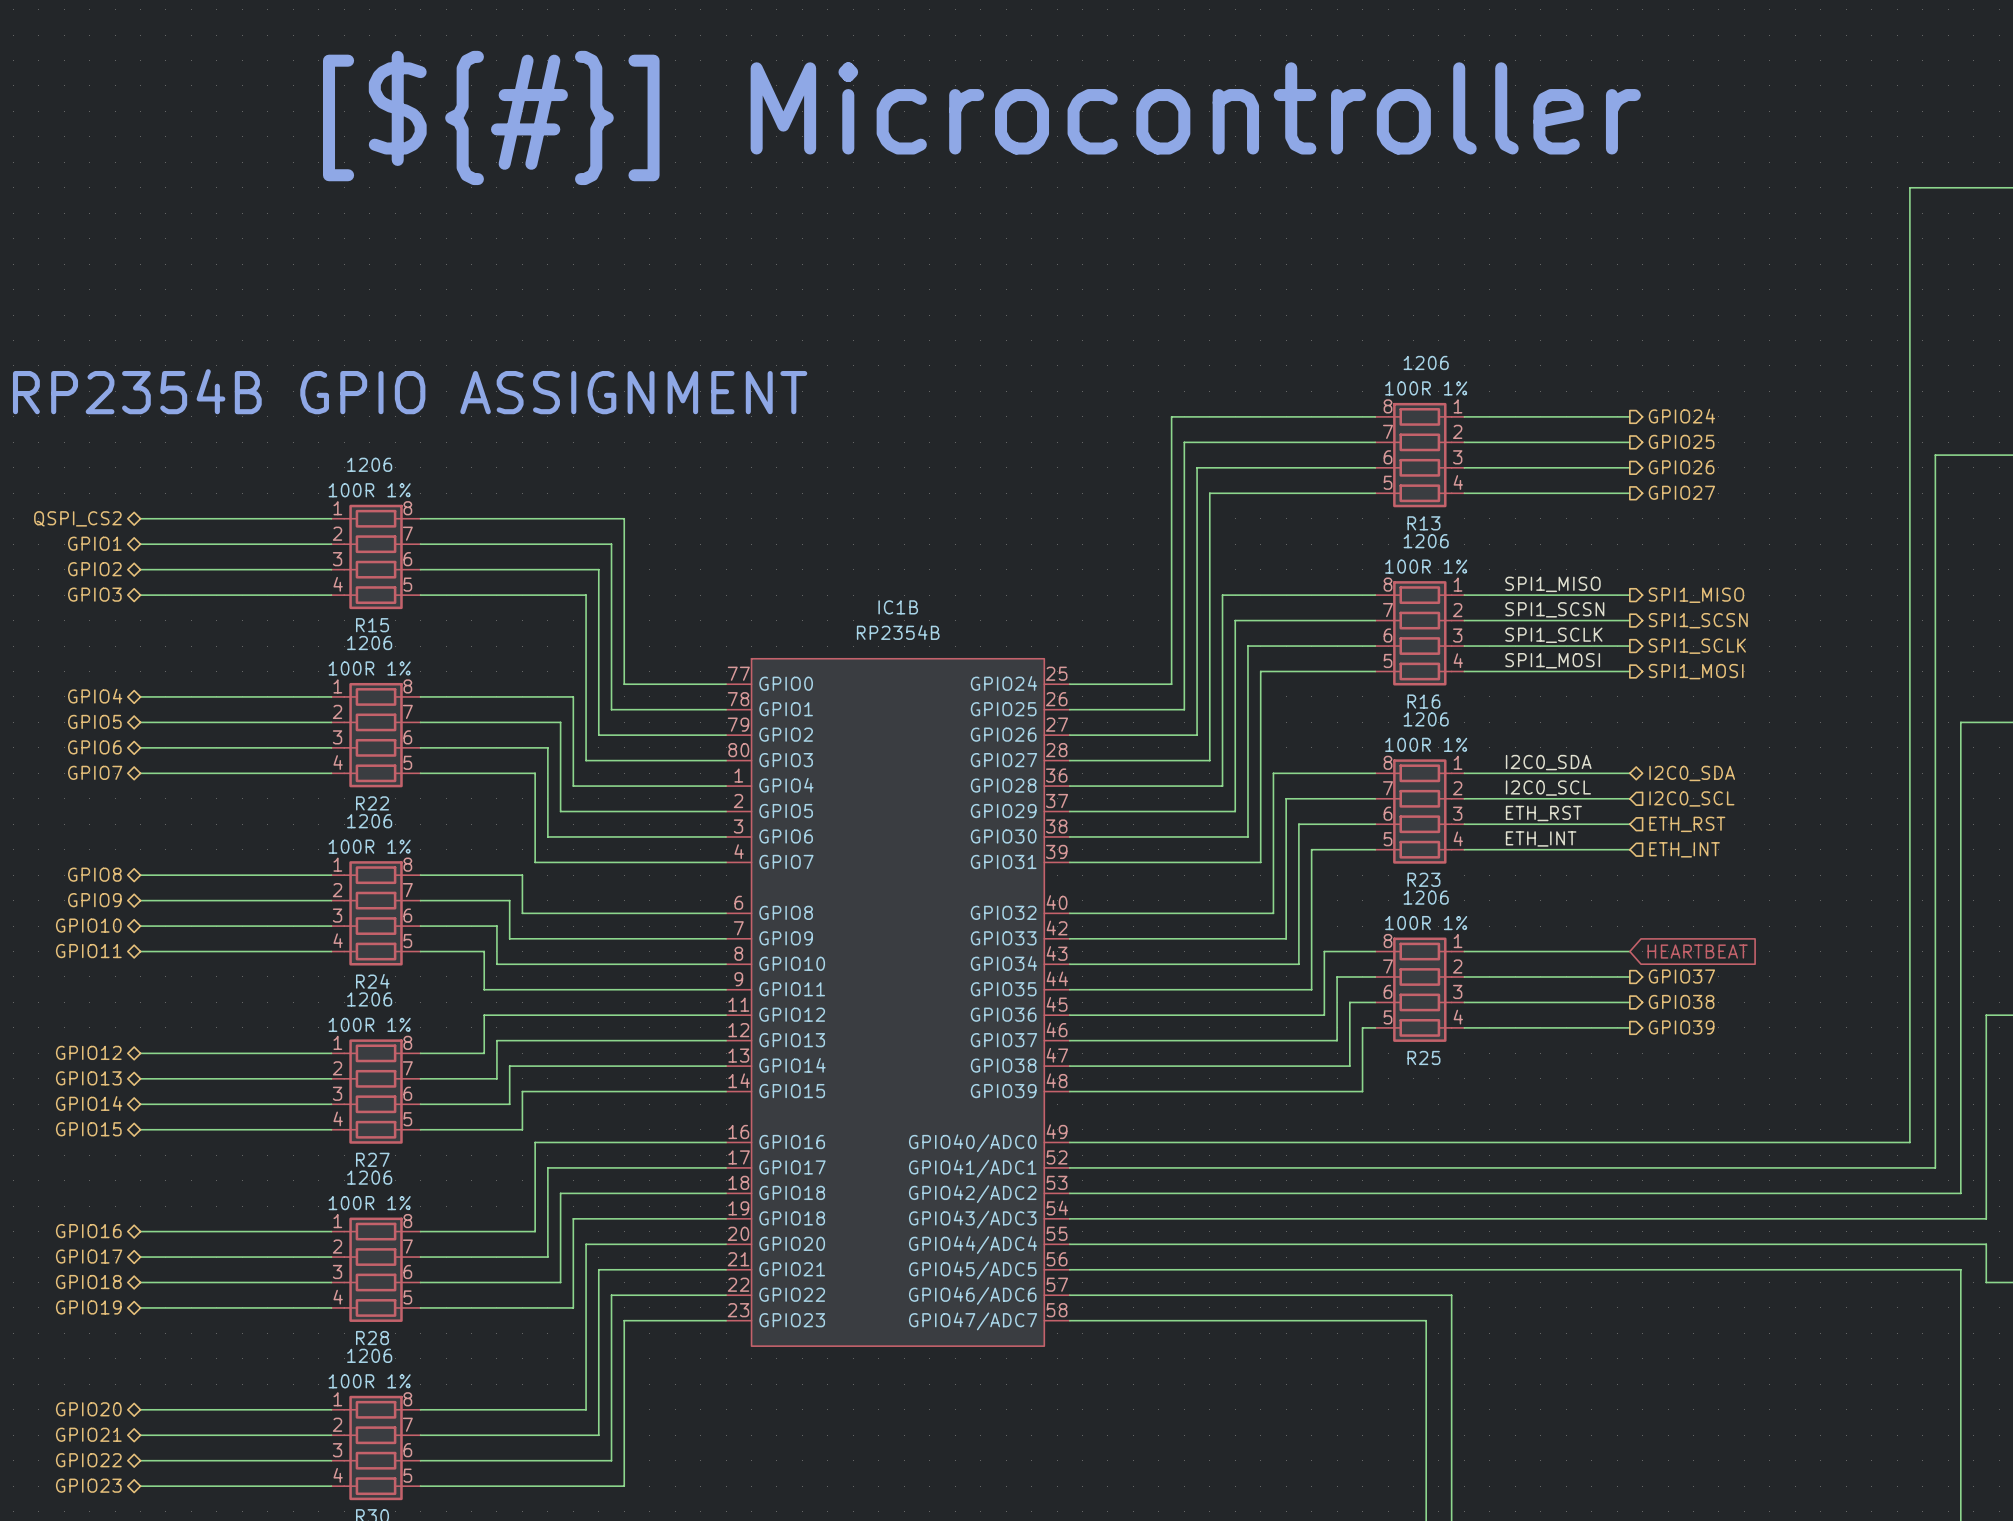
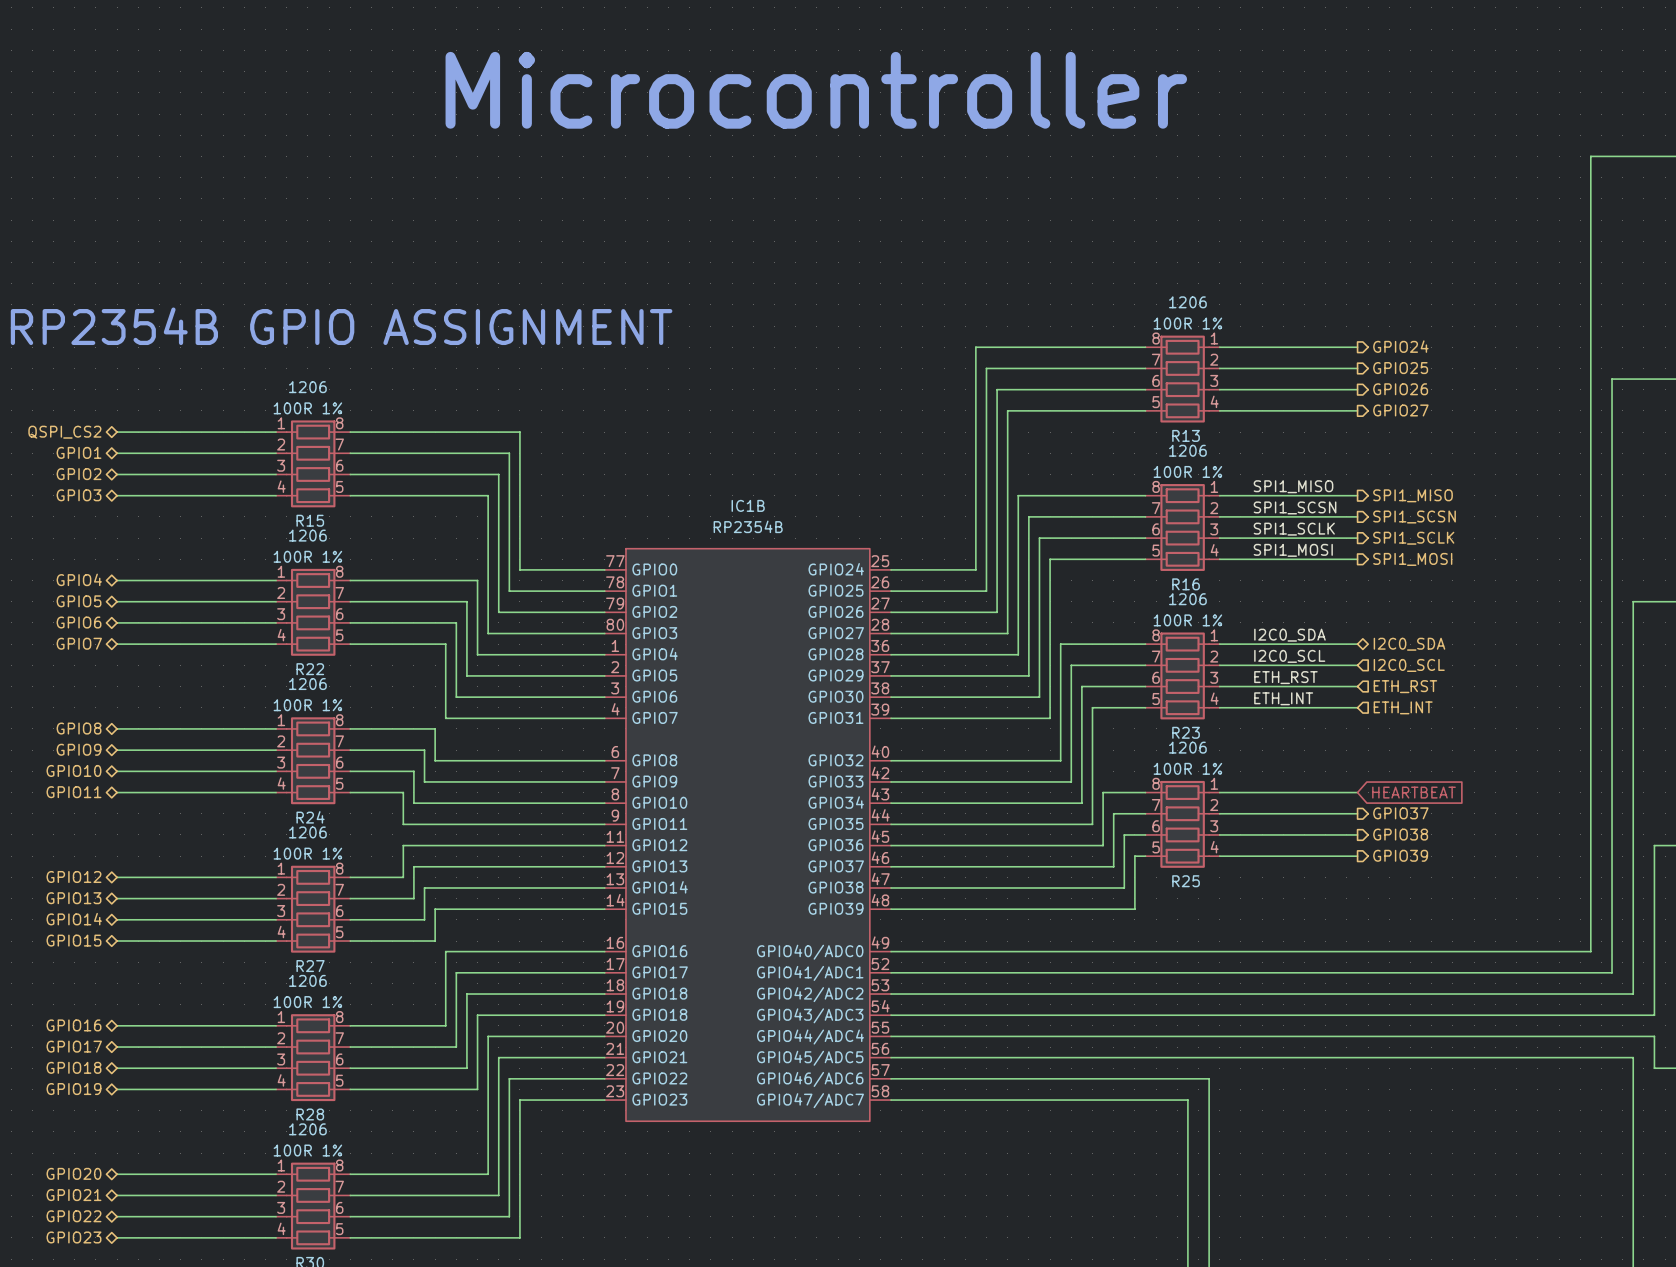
text: [${#}] Microcontroller (981, 117) -> Microcontroller (816, 90)

